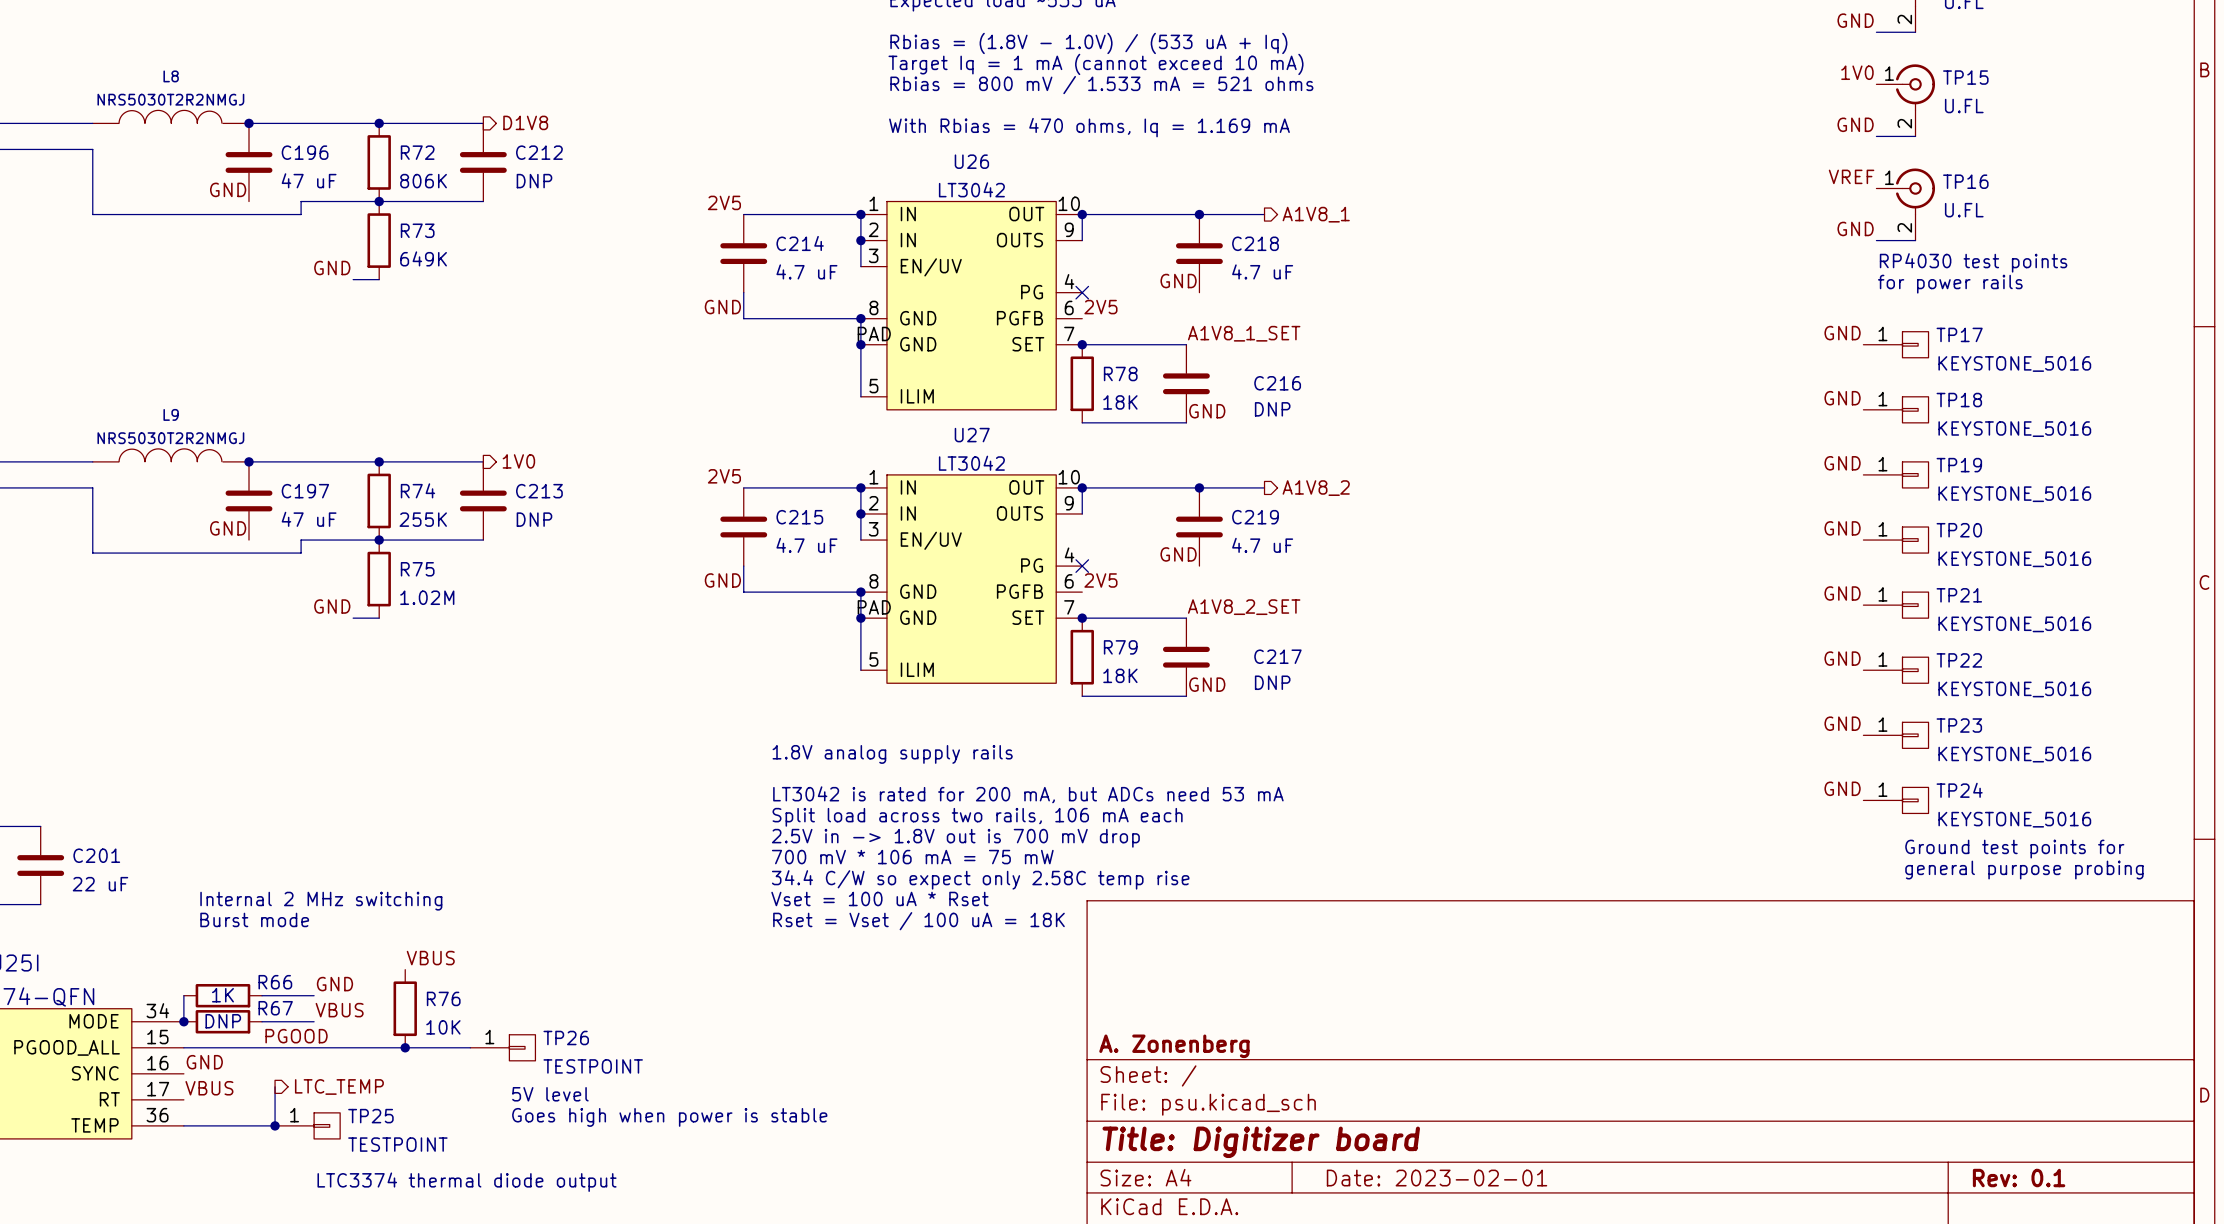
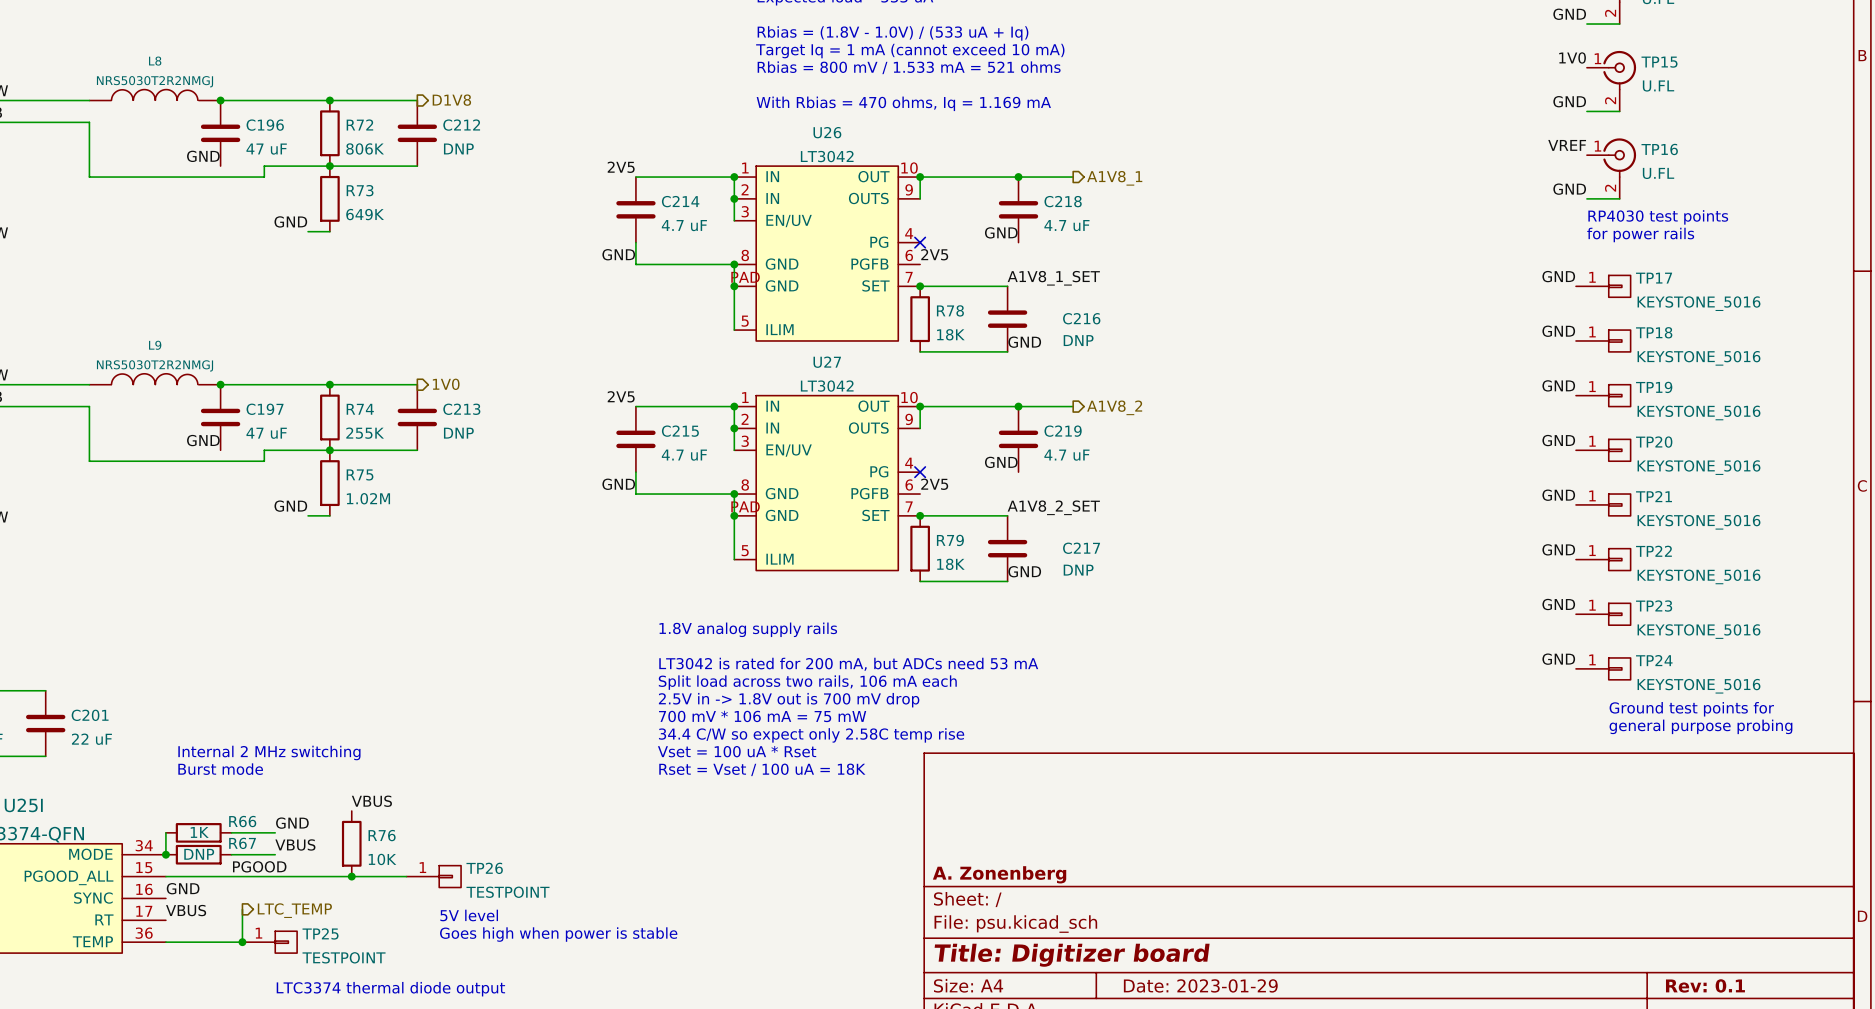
title block: Date: 2023-02-01 (1437, 1178) -> Date: 2023-01-29 (1200, 985)

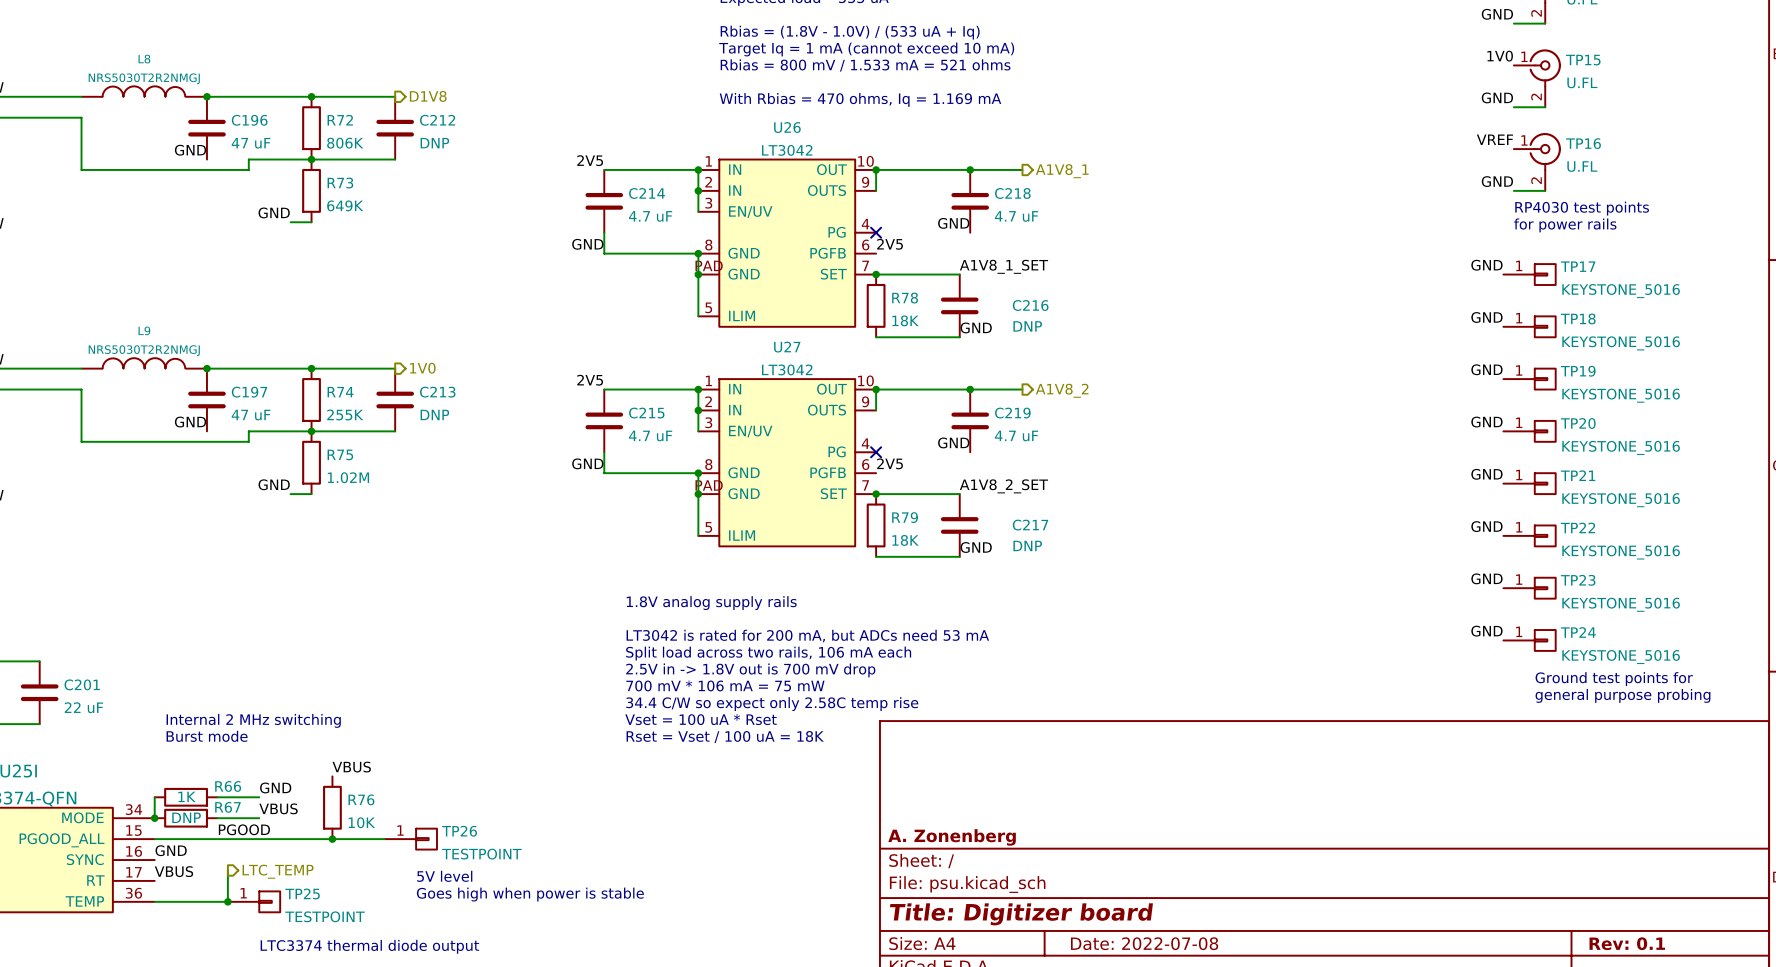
title block: Date: 2023-01-29 (1200, 985) -> Date: 2022-07-08 (1144, 943)

